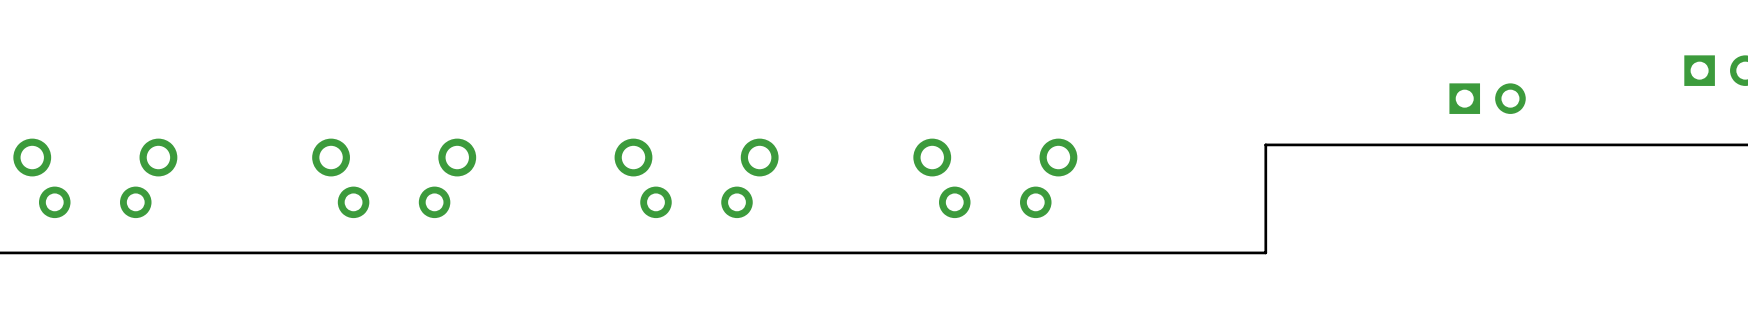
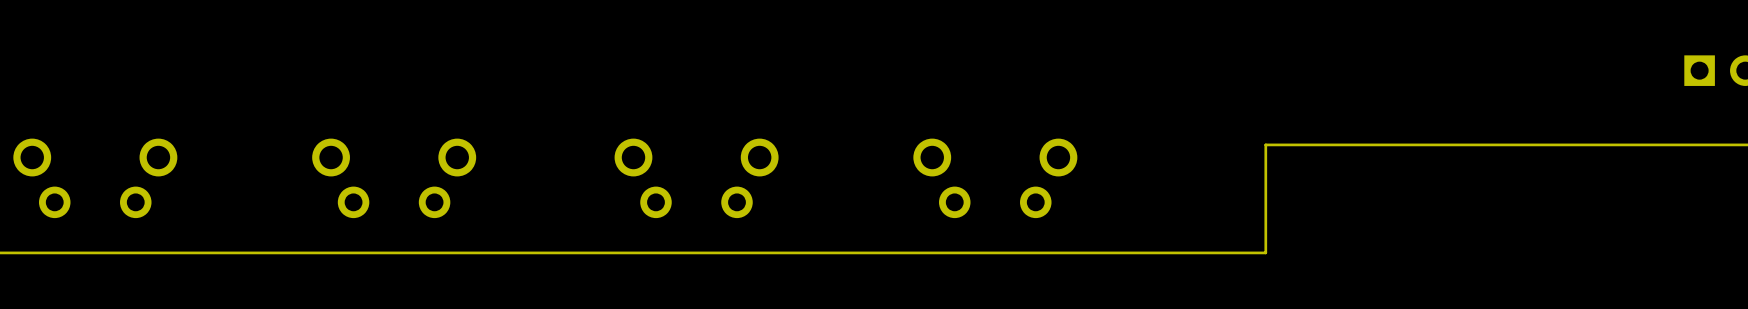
part: (1487, 98) -> none

